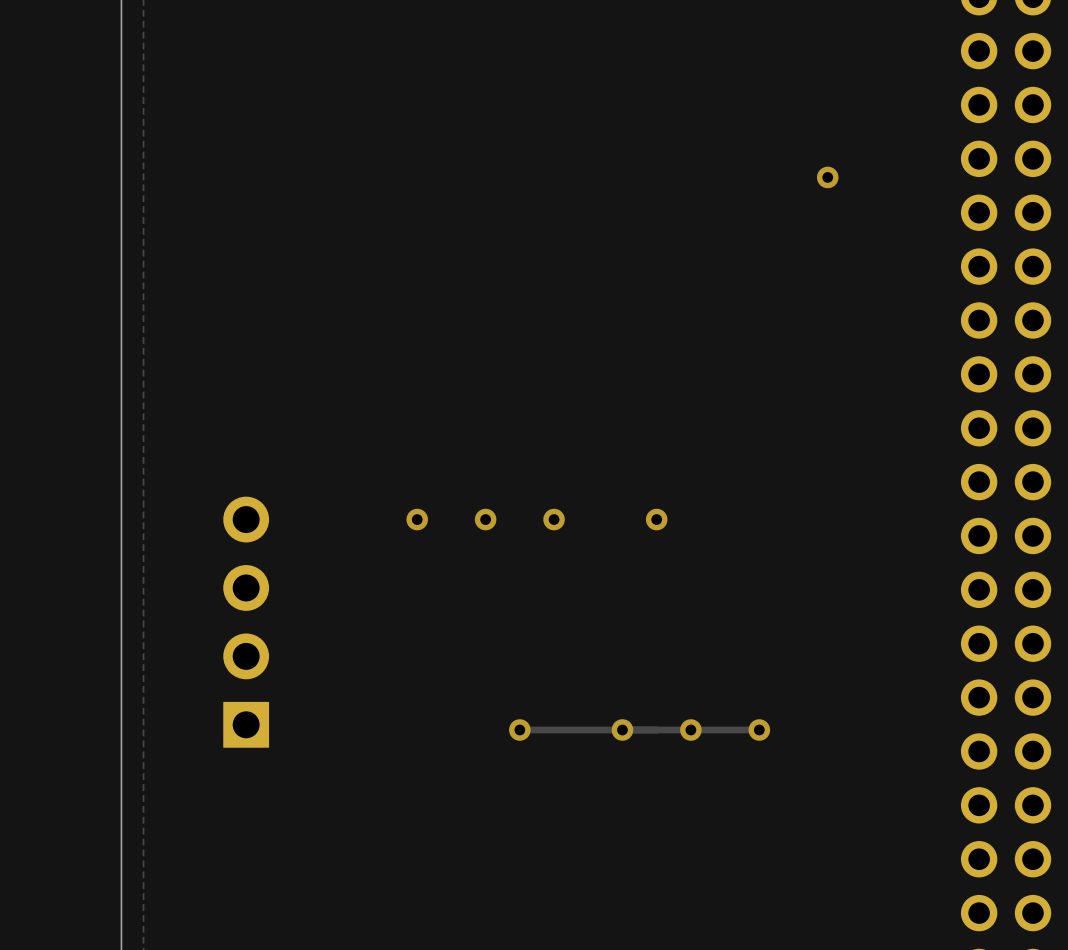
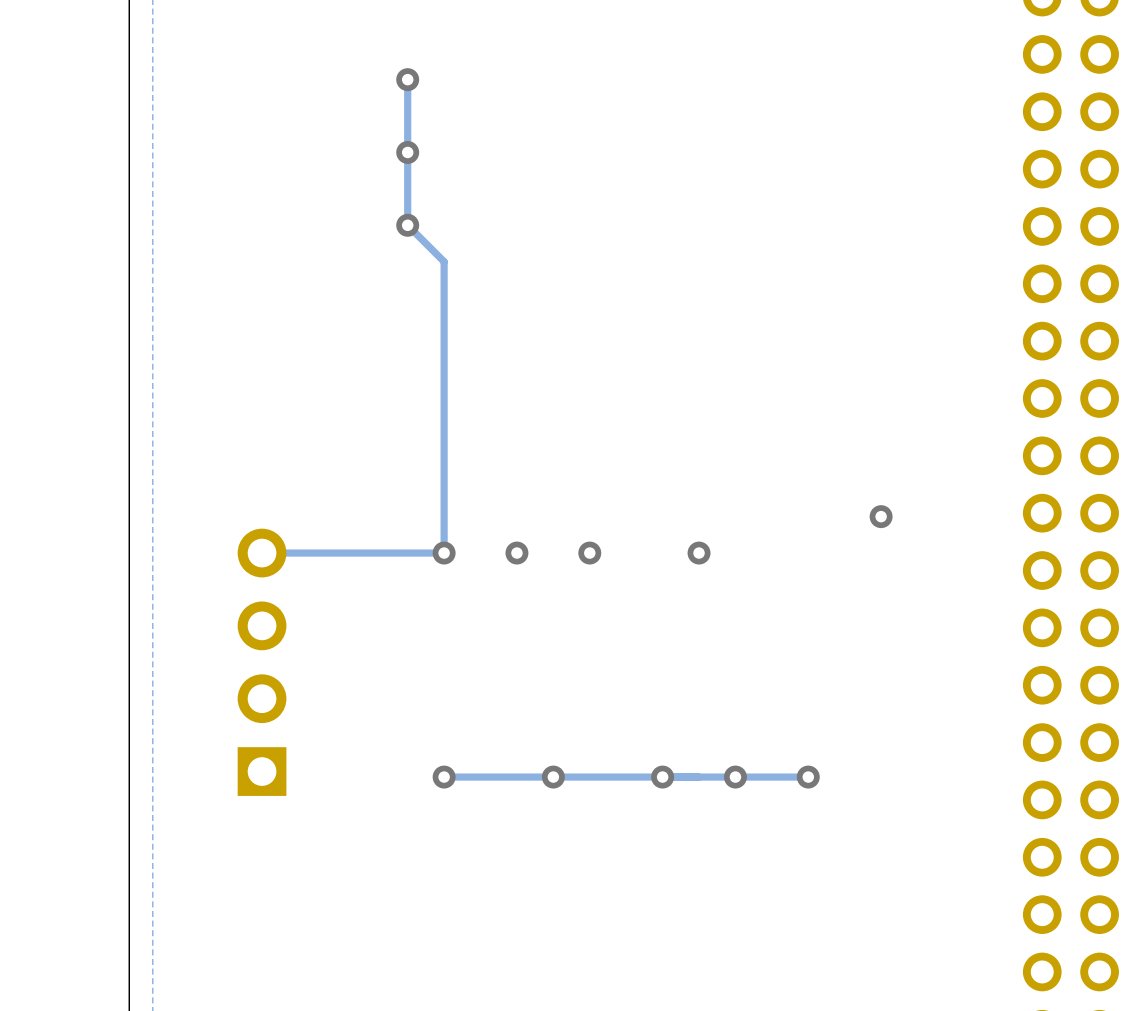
track: none -> (407, 79) (407, 225) (444, 261) (444, 553) (262, 553)
via: none -> (407, 79)
via: none -> (407, 152)
via: (827, 177) -> none
via: none -> (407, 225)
via: none -> (881, 516)
via: none -> (444, 777)
track: none -> (553, 777) (444, 777)

